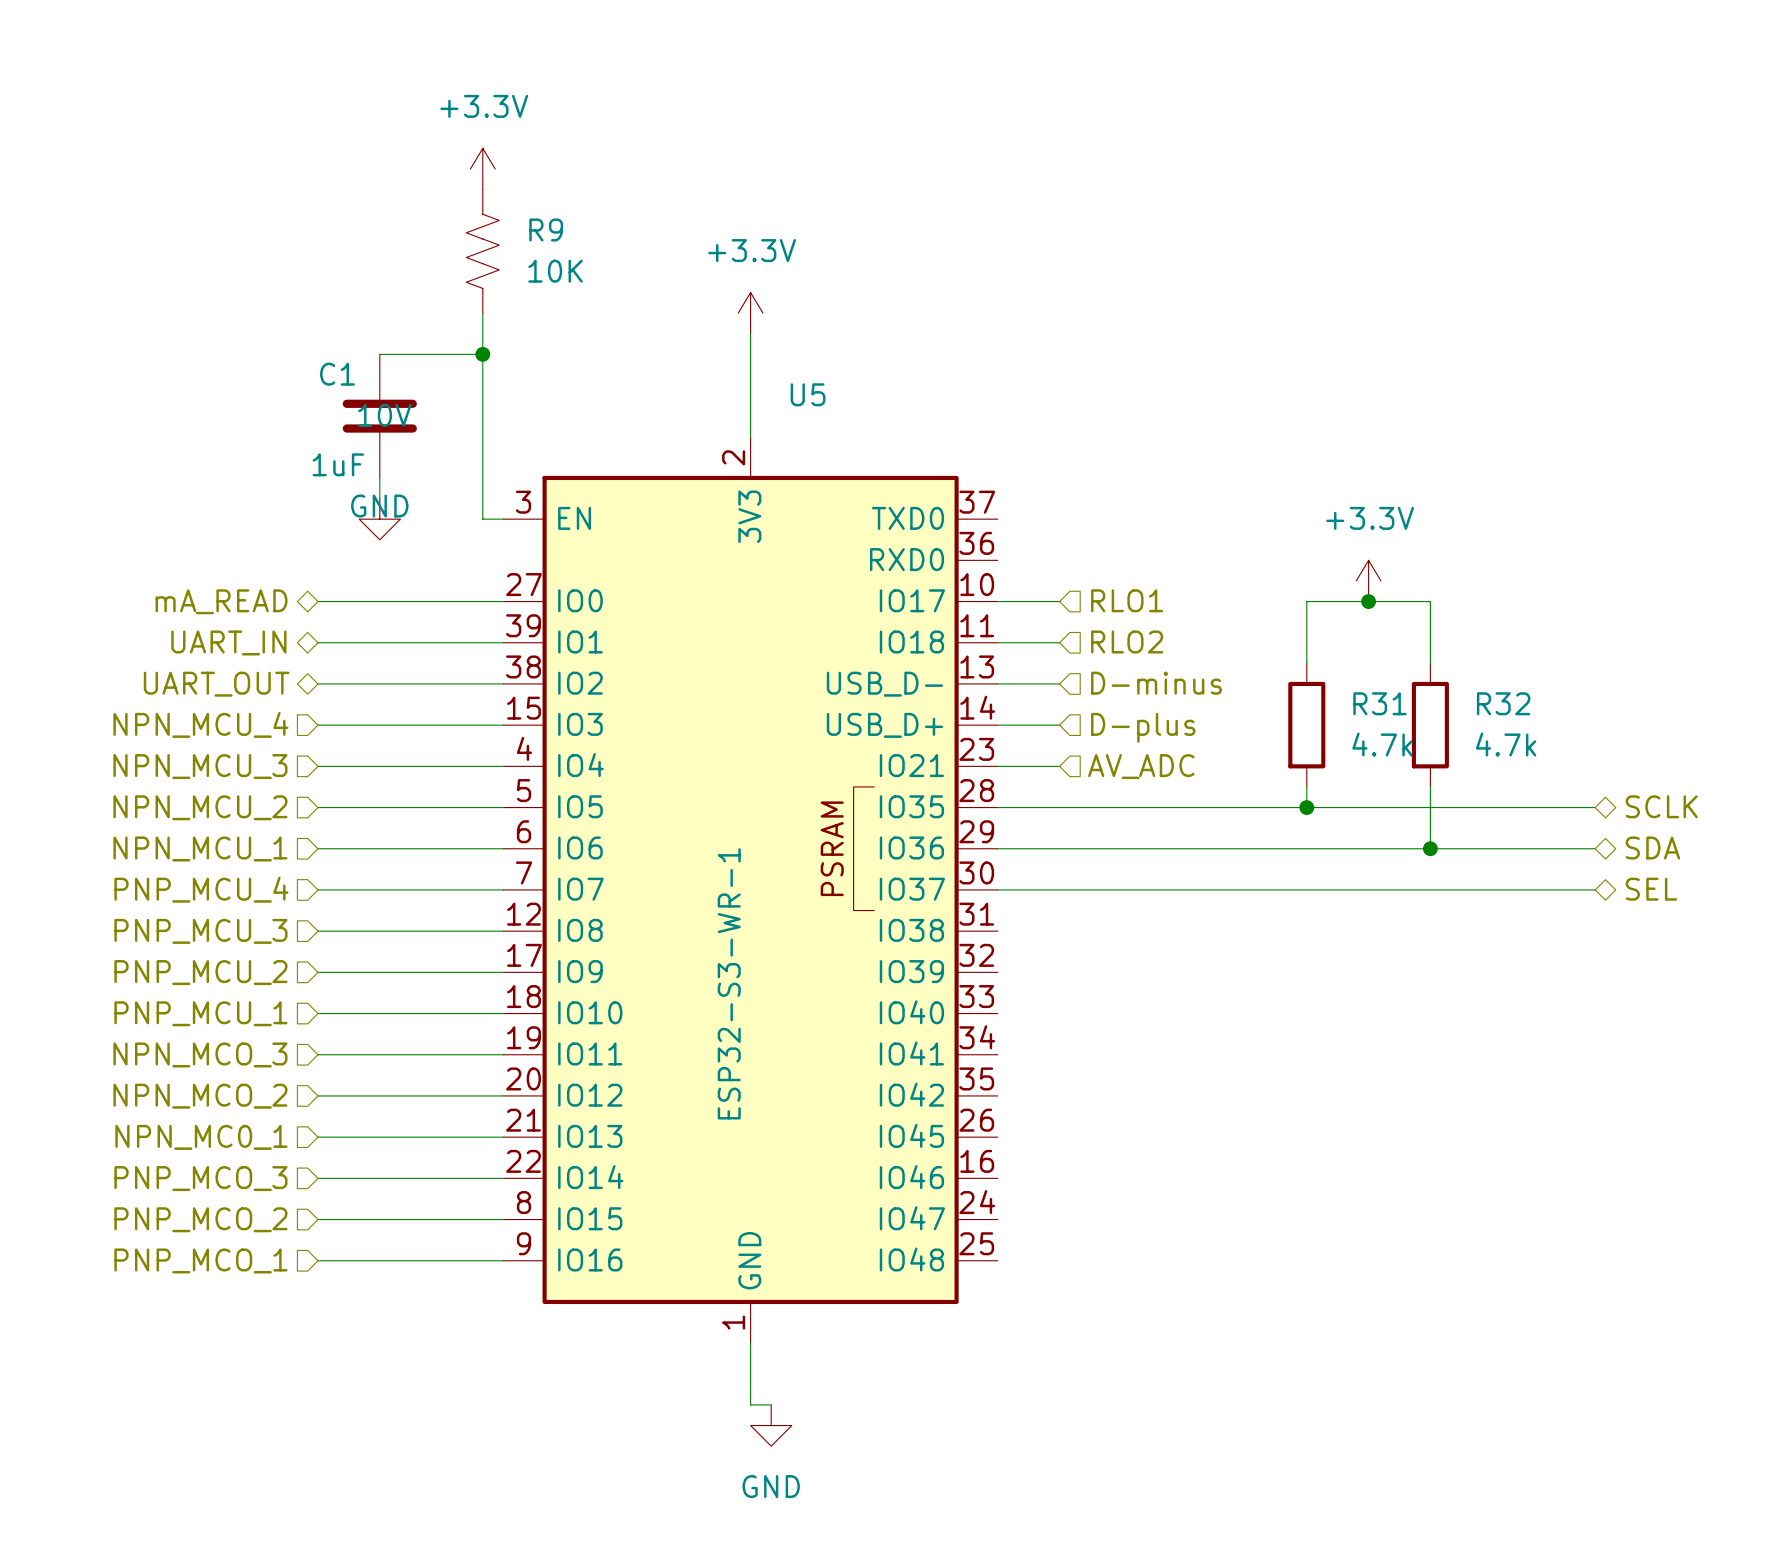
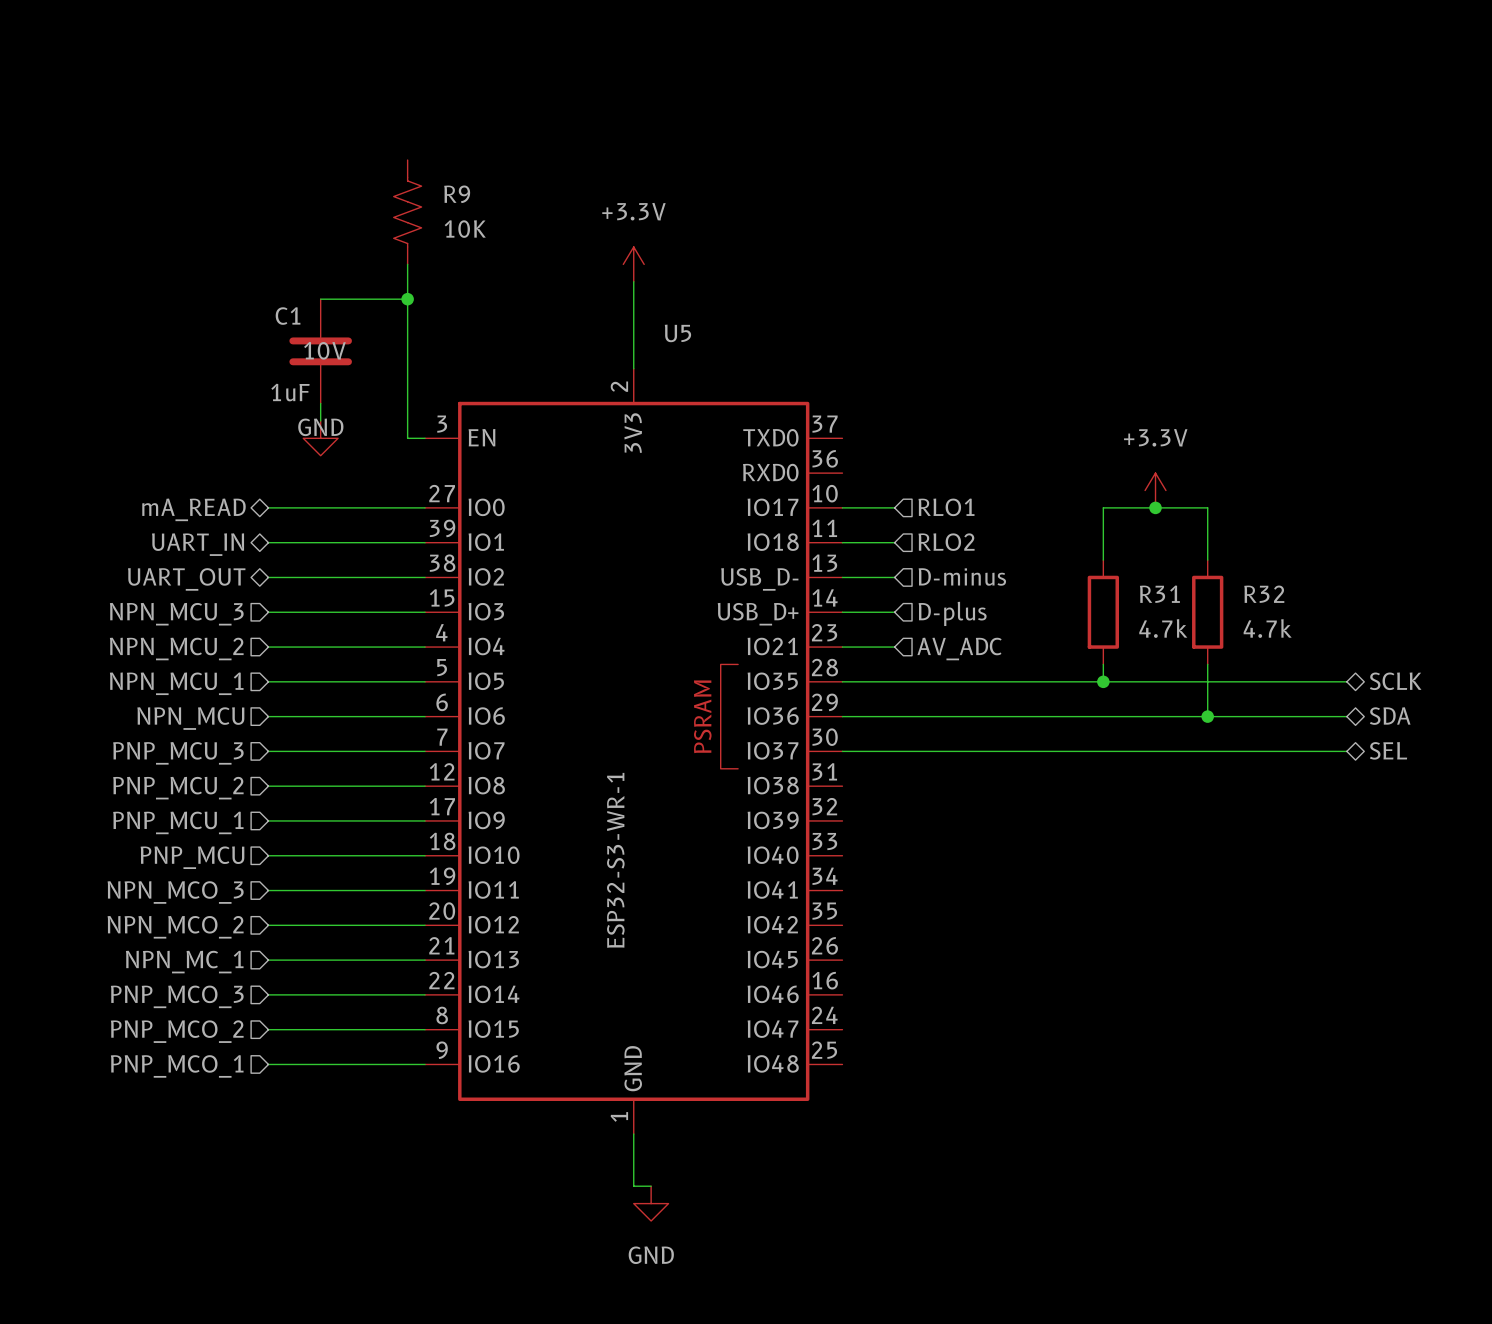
power symbol: +3.3V (482, 168) -> none
hierarchical label: NPN_MCU_4 (200, 724) -> NPN_MCU_3 (176, 614)
hierarchical label: NPN_MCU_3 (200, 766) -> NPN_MCU_2 (176, 648)
hierarchical label: NPN_MCU_2 (200, 807) -> NPN_MCU_1 (176, 683)
hierarchical label: NPN_MCU_1 (200, 848) -> NPN_MCU (190, 718)
hierarchical label: PNP_MCU_4 (201, 889) -> PNP_MCU_3 (178, 753)
hierarchical label: PNP_MCU_3 (200, 931) -> PNP_MCU_2 (178, 788)
hierarchical label: PNP_MCU_2 (200, 972) -> PNP_MCU_1 (178, 822)
hierarchical label: PNP_MCU_1 (200, 1013) -> PNP_MCU (192, 857)
hierarchical label: NPN_MC0_1 (201, 1137) -> NPN_MC_1 (184, 962)

